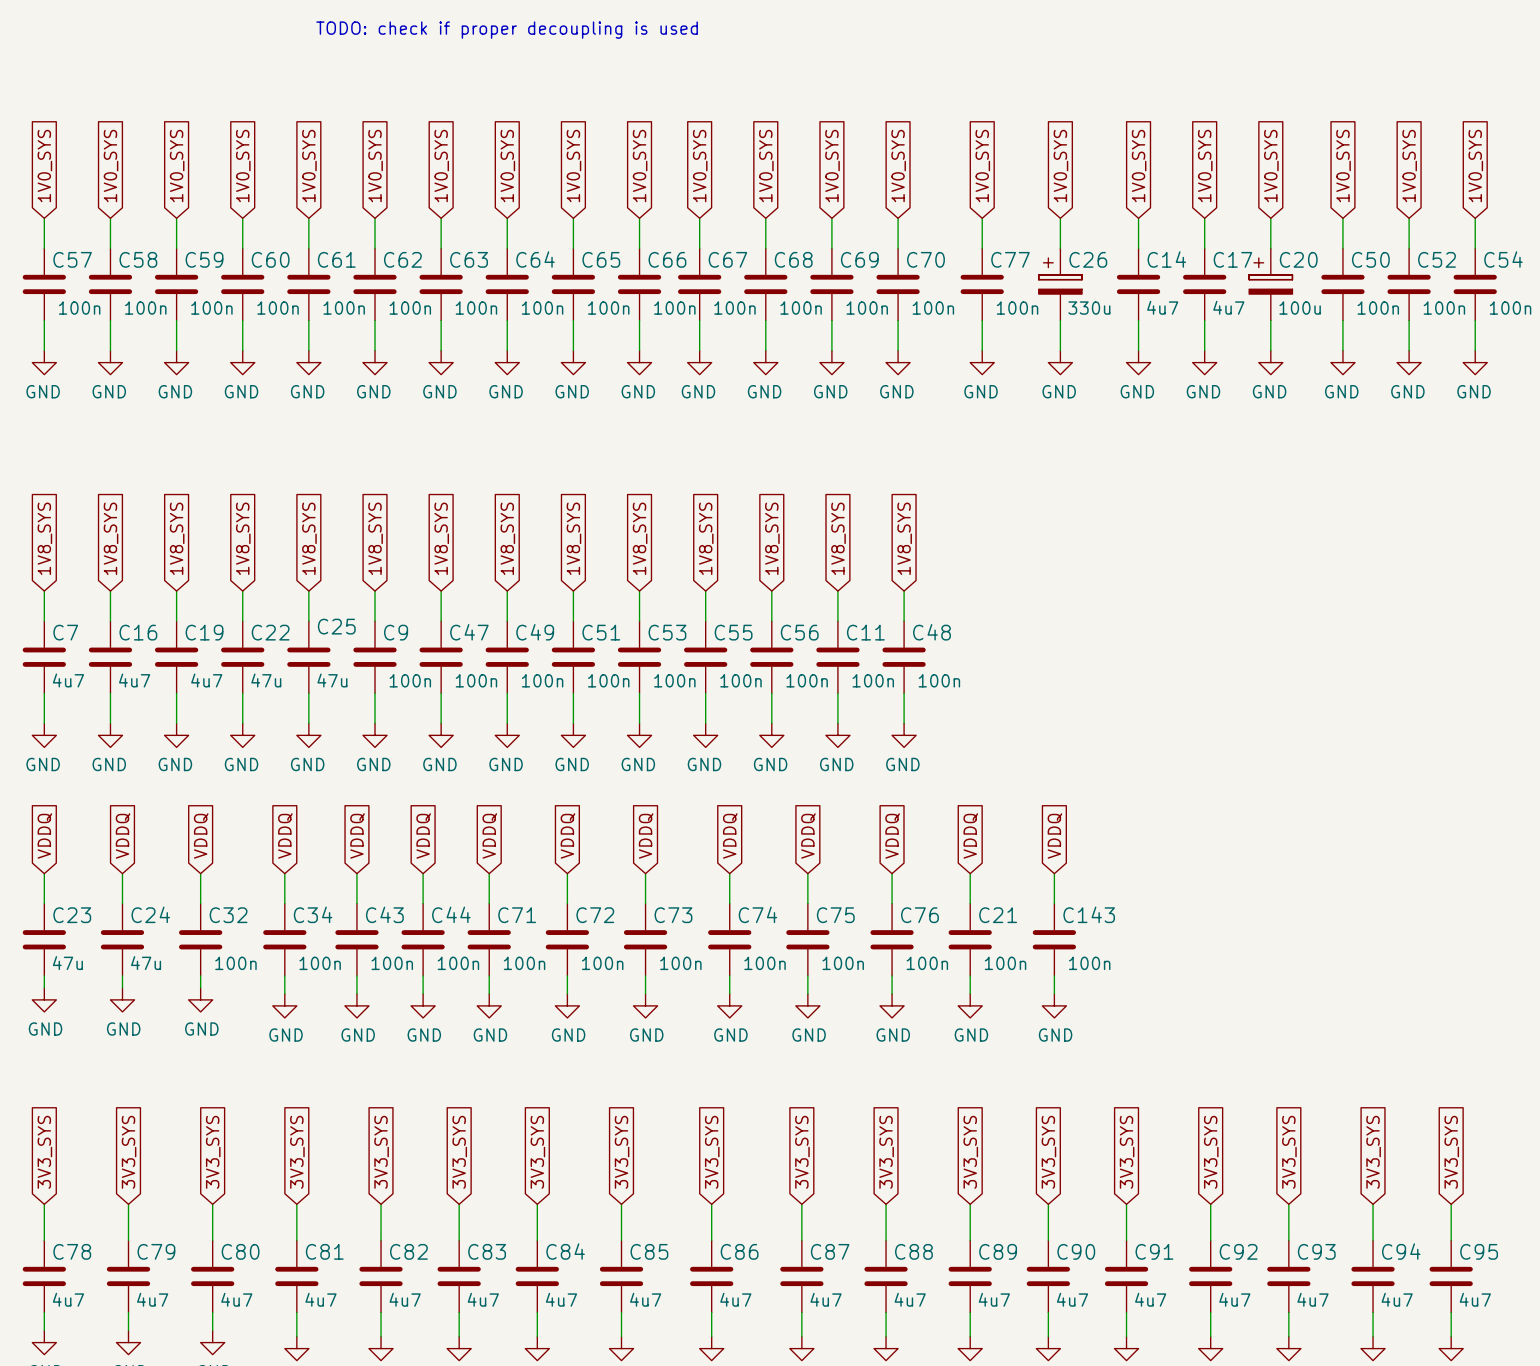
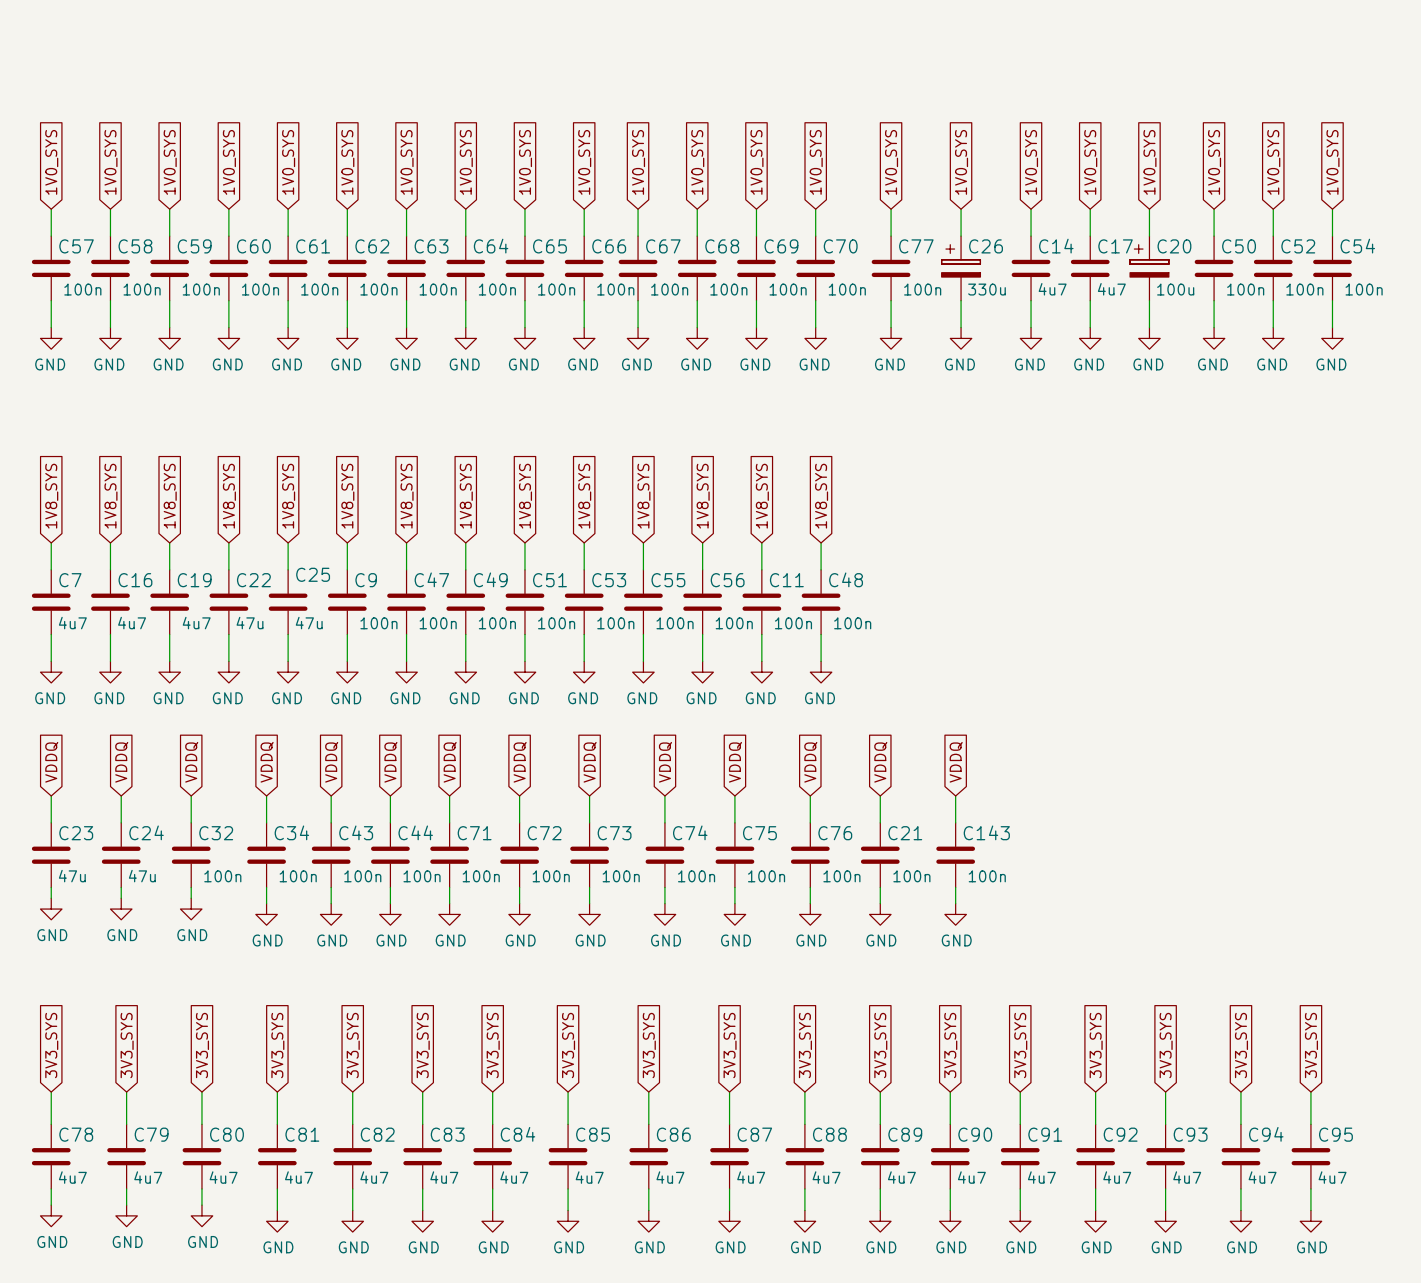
text: TODO: check if proper decoupling is used (507, 30) -> none

